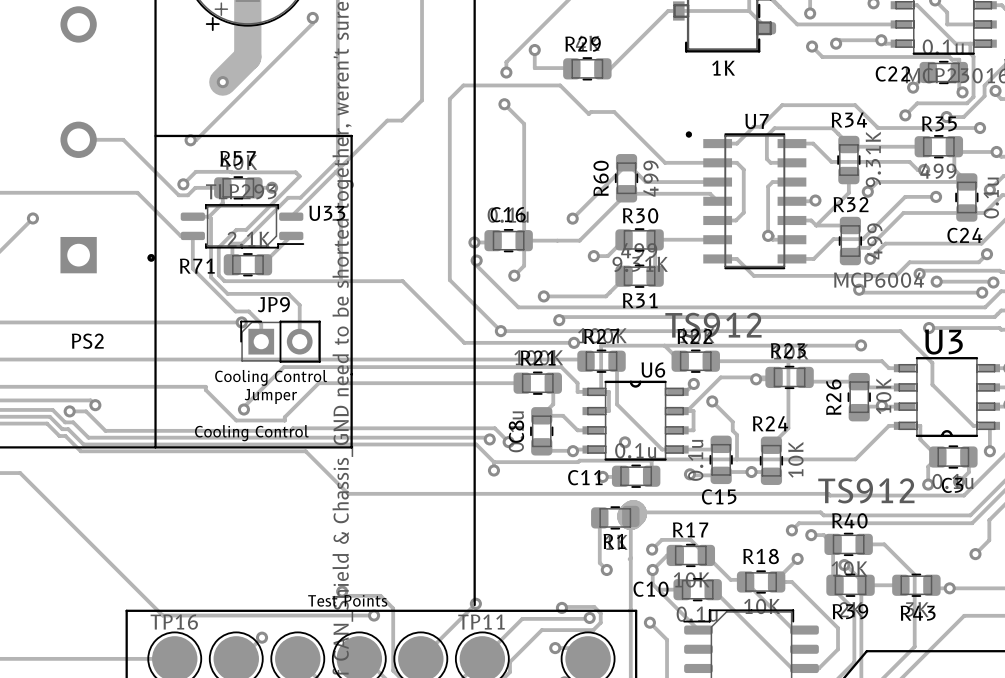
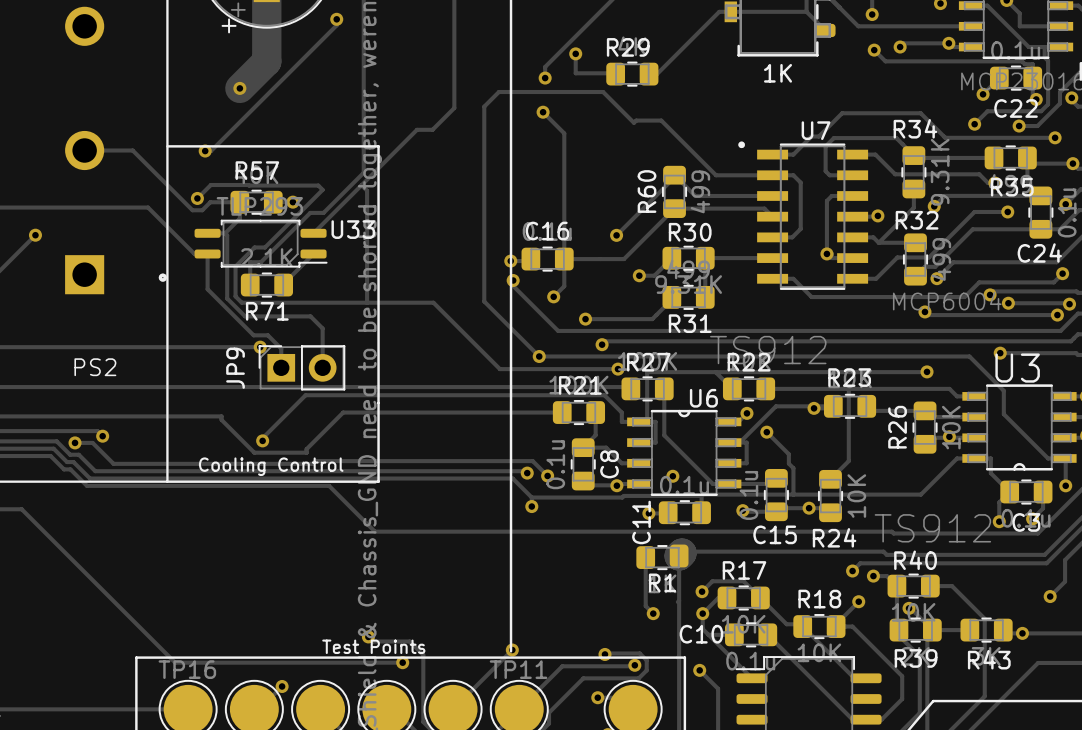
C22 name position: C22 (892, 73) -> C22 (1016, 108)
R35 name position: R35 (939, 123) -> R35 (1012, 187)
R71 name position: R71 (197, 266) -> R71 (267, 311)
JP9 name rotation: 0° (273, 304) -> 90° counterclockwise (235, 368)
JP9 name position: JP9 (273, 304) -> JP9 (235, 368)
text: Cooling Control (271, 377) -> none
text: Jumper (270, 396) -> none
R24 name position: R24 (770, 423) -> R24 (834, 537)
C8 name position: C8 (516, 431) -> C8 (609, 464)
C11 name rotation: 0° (585, 477) -> 90° counterclockwise (641, 522)

